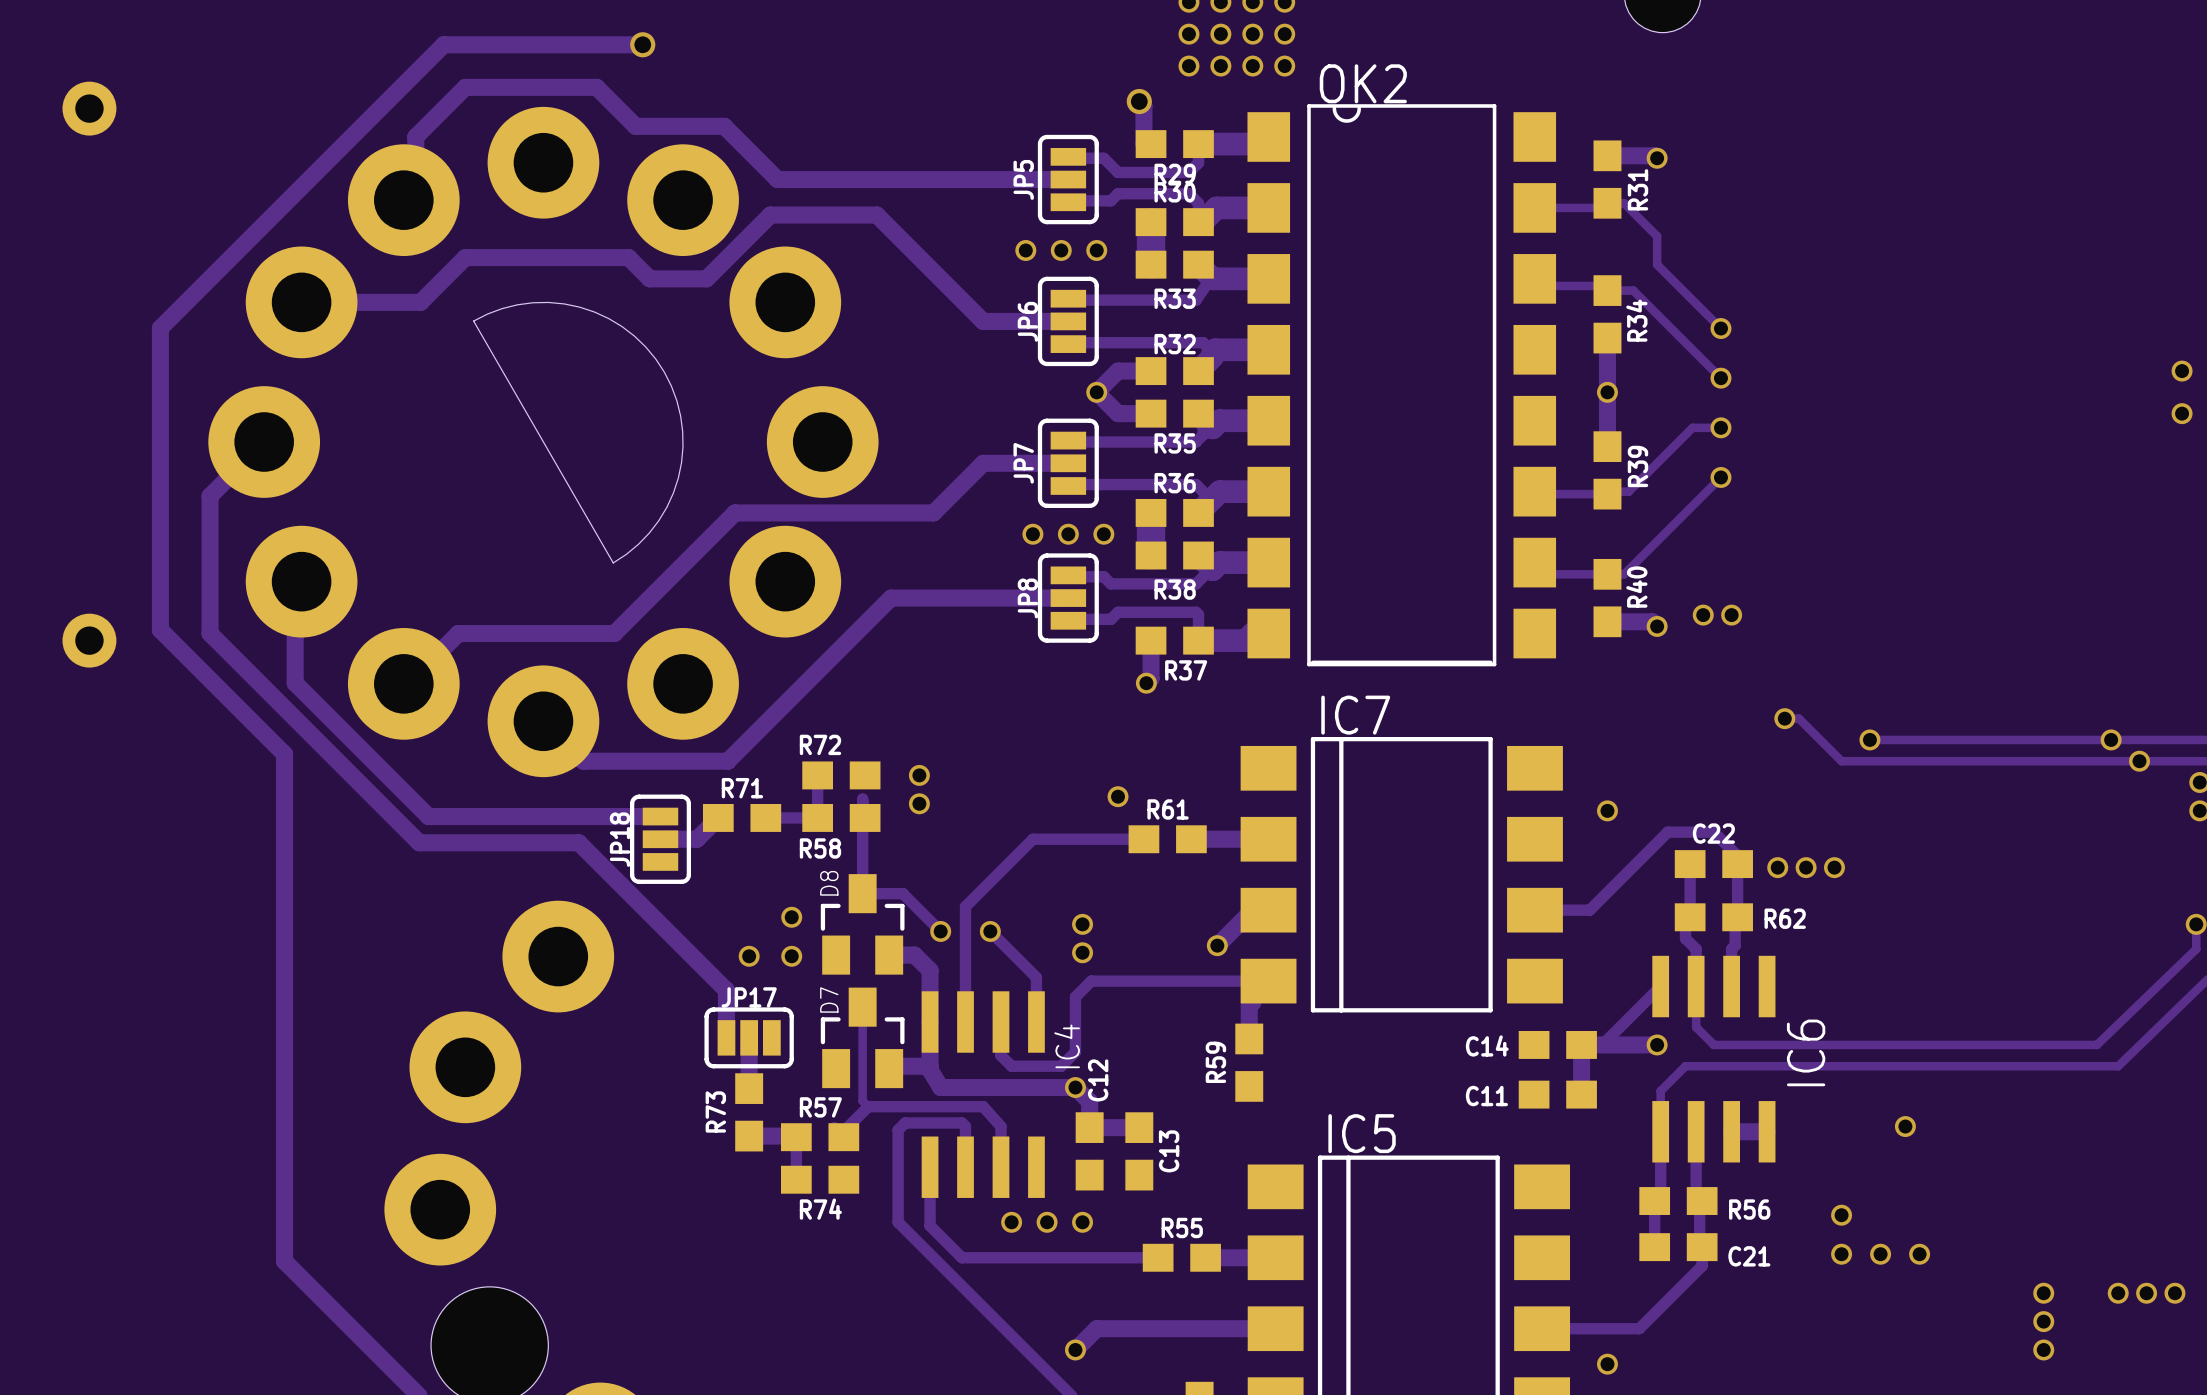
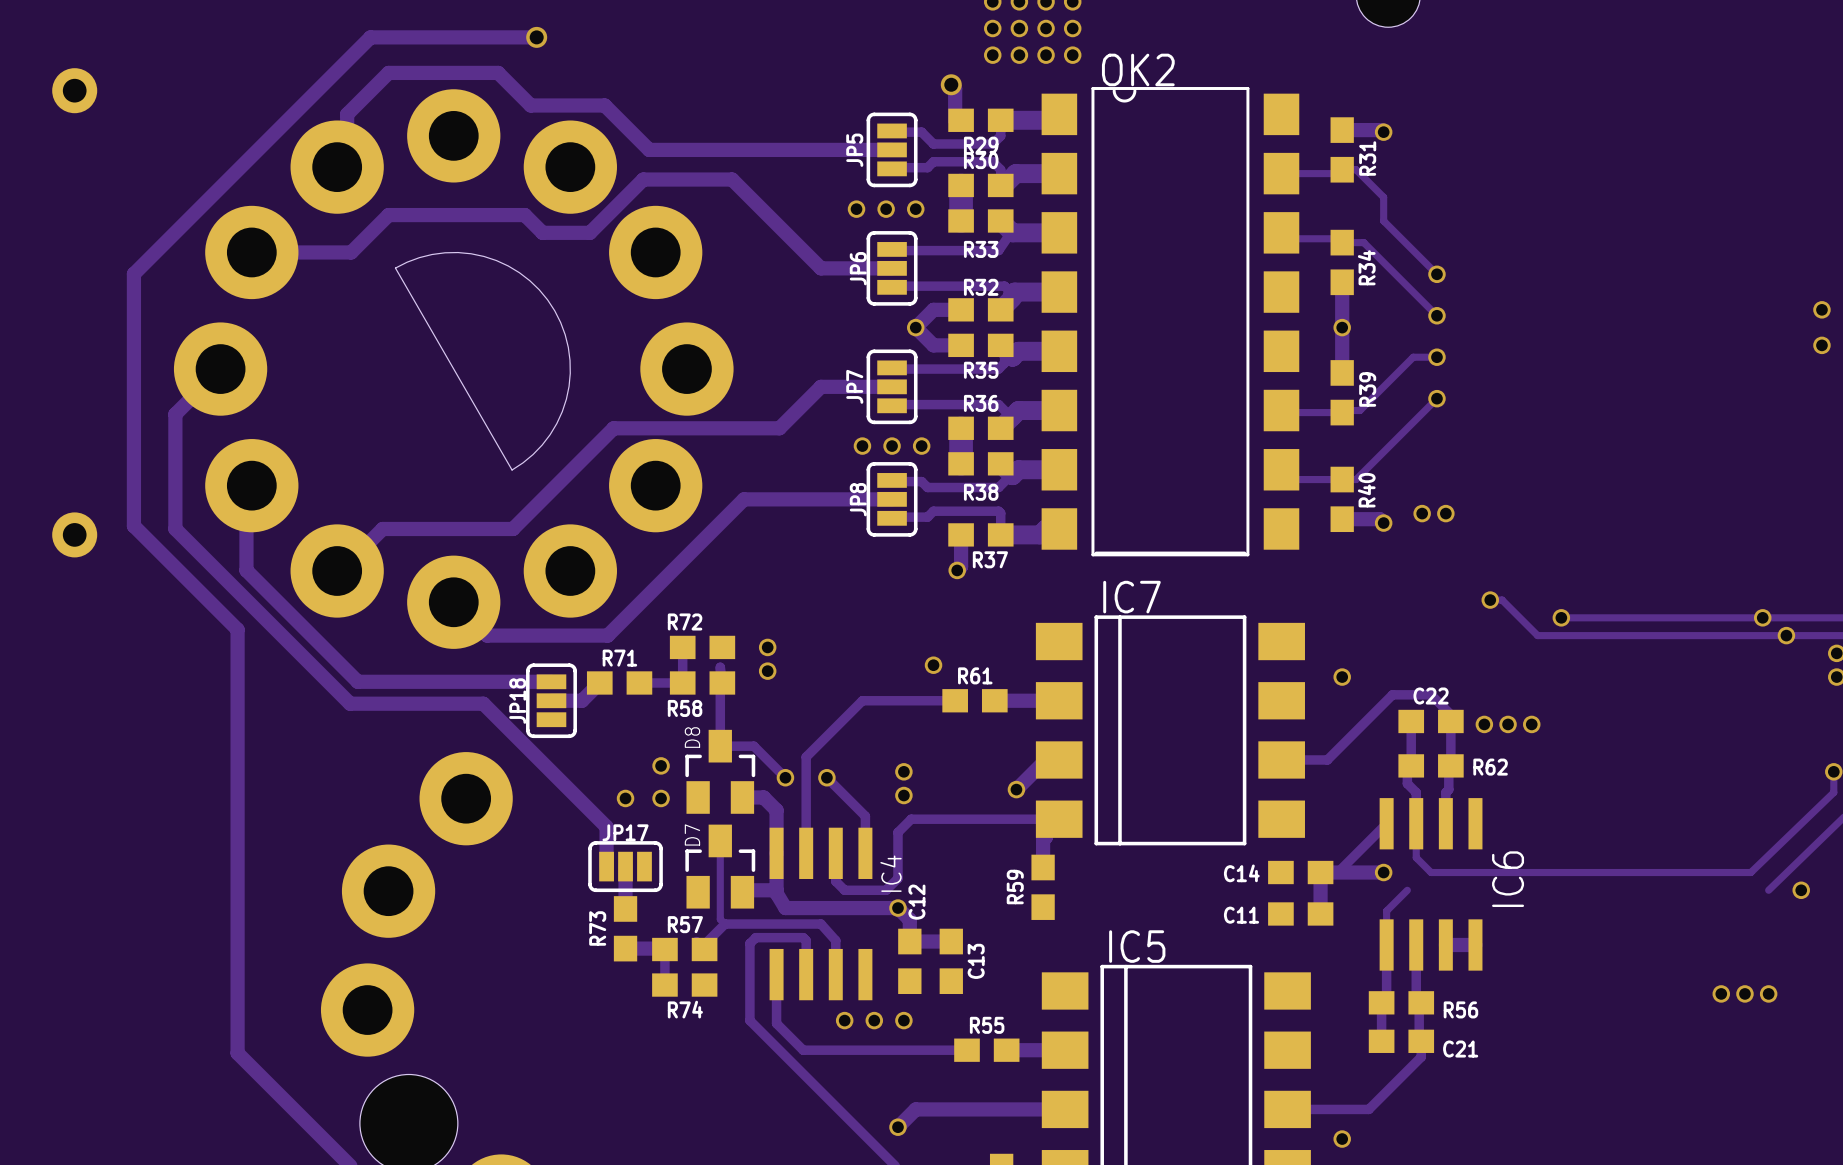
track: (2118, 1066) (1685, 1066) -> none
via: none -> (1801, 890)
via: (1905, 1126) -> none
via: none -> (1721, 993)
via: none -> (1744, 993)
via: none -> (1768, 993)
via: (1841, 1215) -> none
via: (1841, 1254) -> none
via: (1880, 1254) -> none
via: (1919, 1254) -> none
via: (2043, 1293) -> none
via: (2118, 1293) -> none
via: (2146, 1293) -> none
via: (2174, 1293) -> none
via: (2043, 1321) -> none
via: (2043, 1349) -> none

